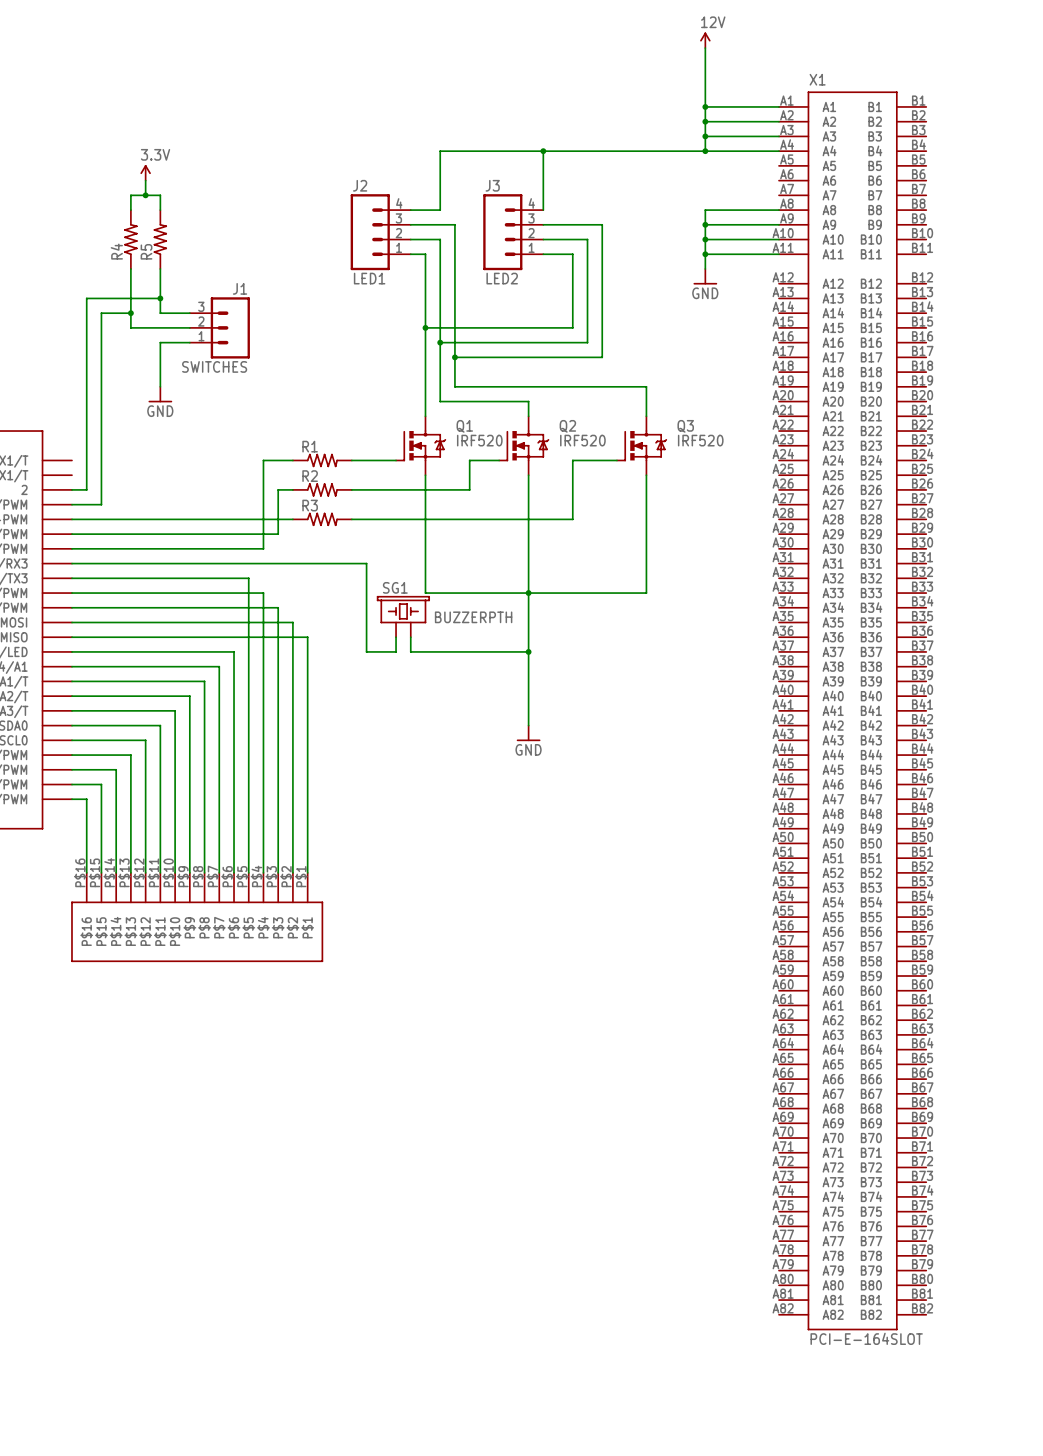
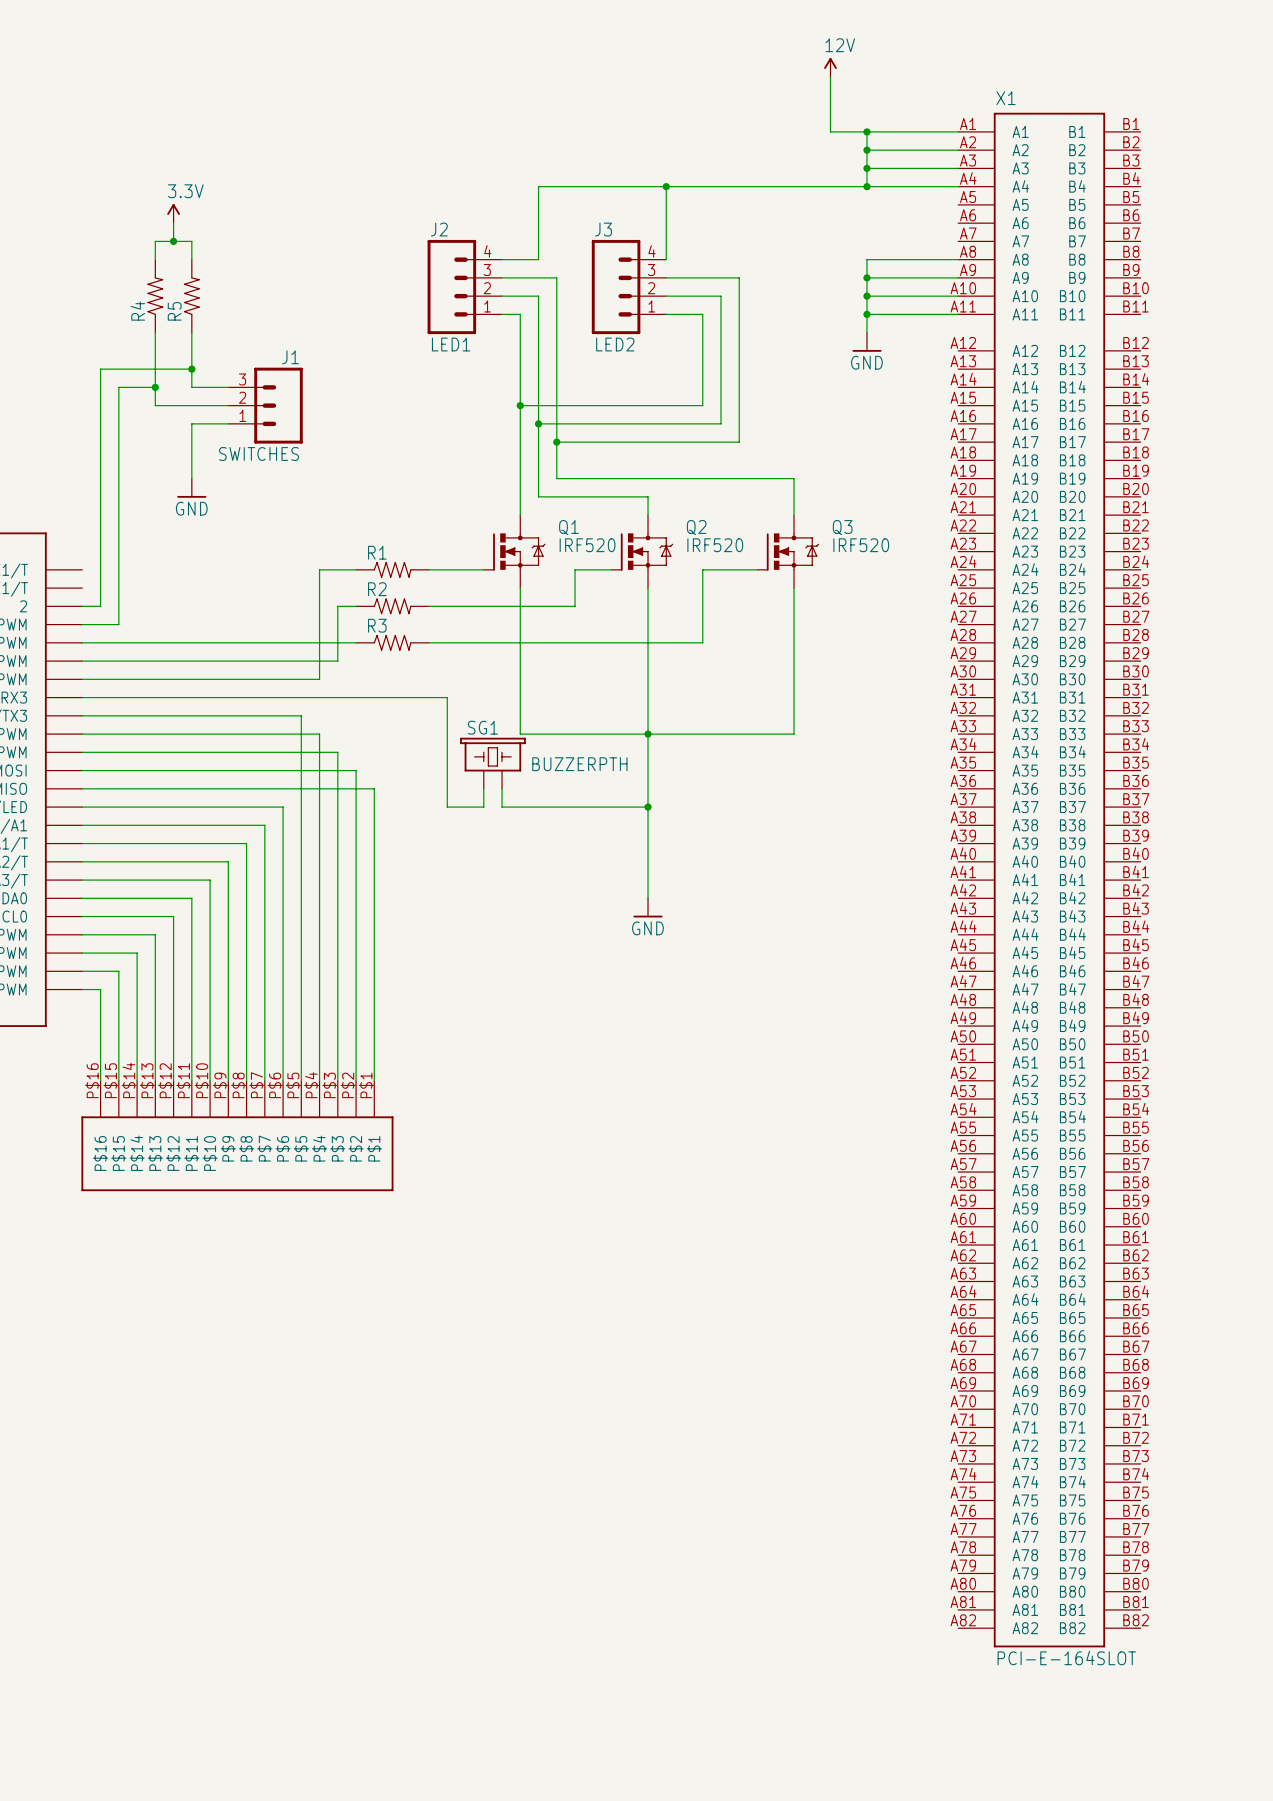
power symbol position: 12V (705, 40) -> 12V (830, 67)
wire: (705, 48) (705, 106) -> (830, 77) (830, 131) (866, 131)

